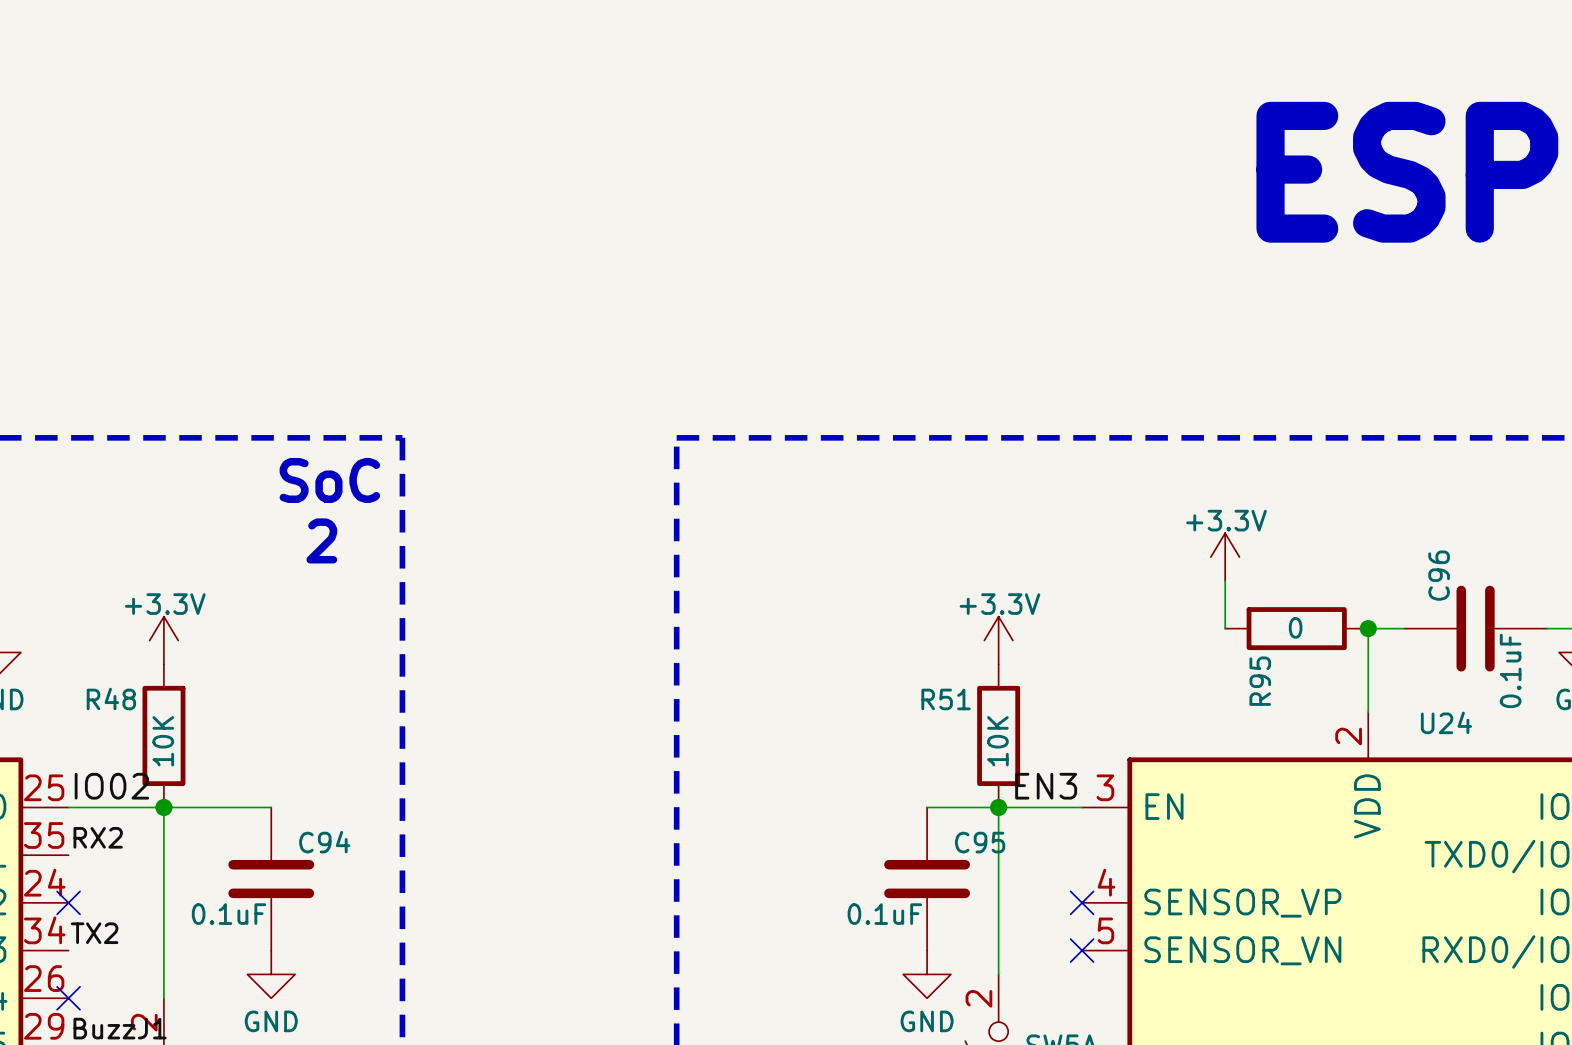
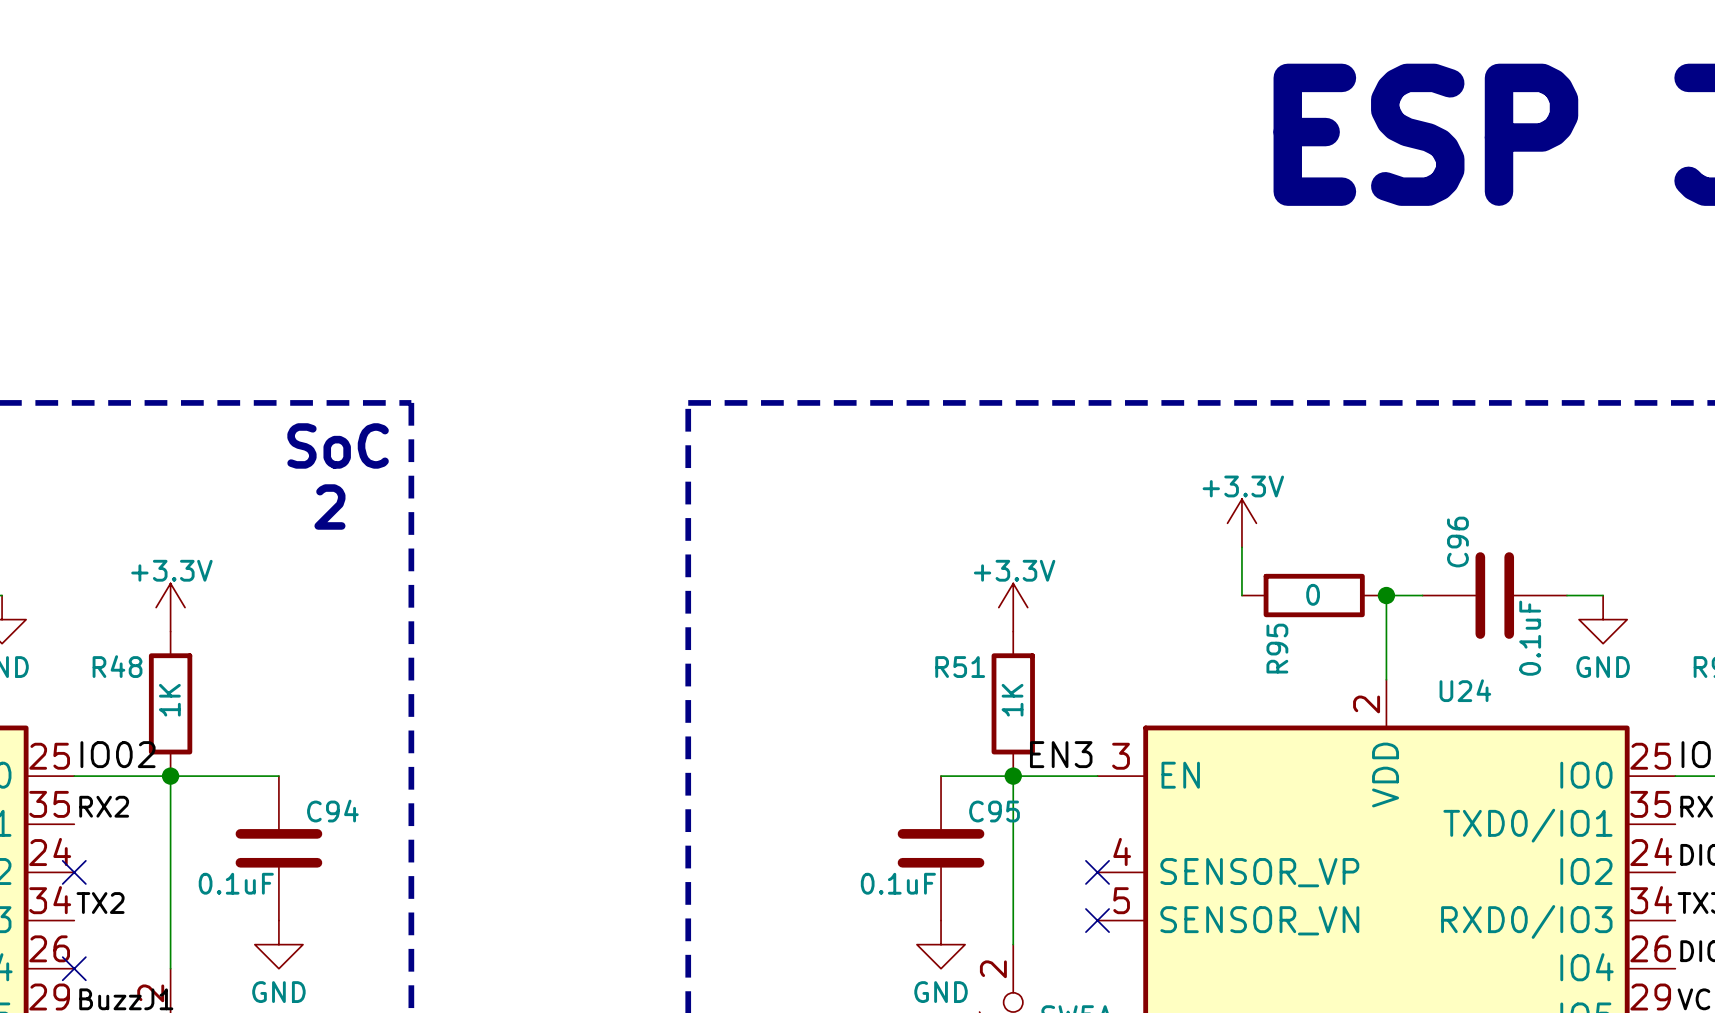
R48 value: 10K (163, 741) -> 1K (169, 700)
R51 value: 10K (997, 741) -> 1K (1012, 700)

